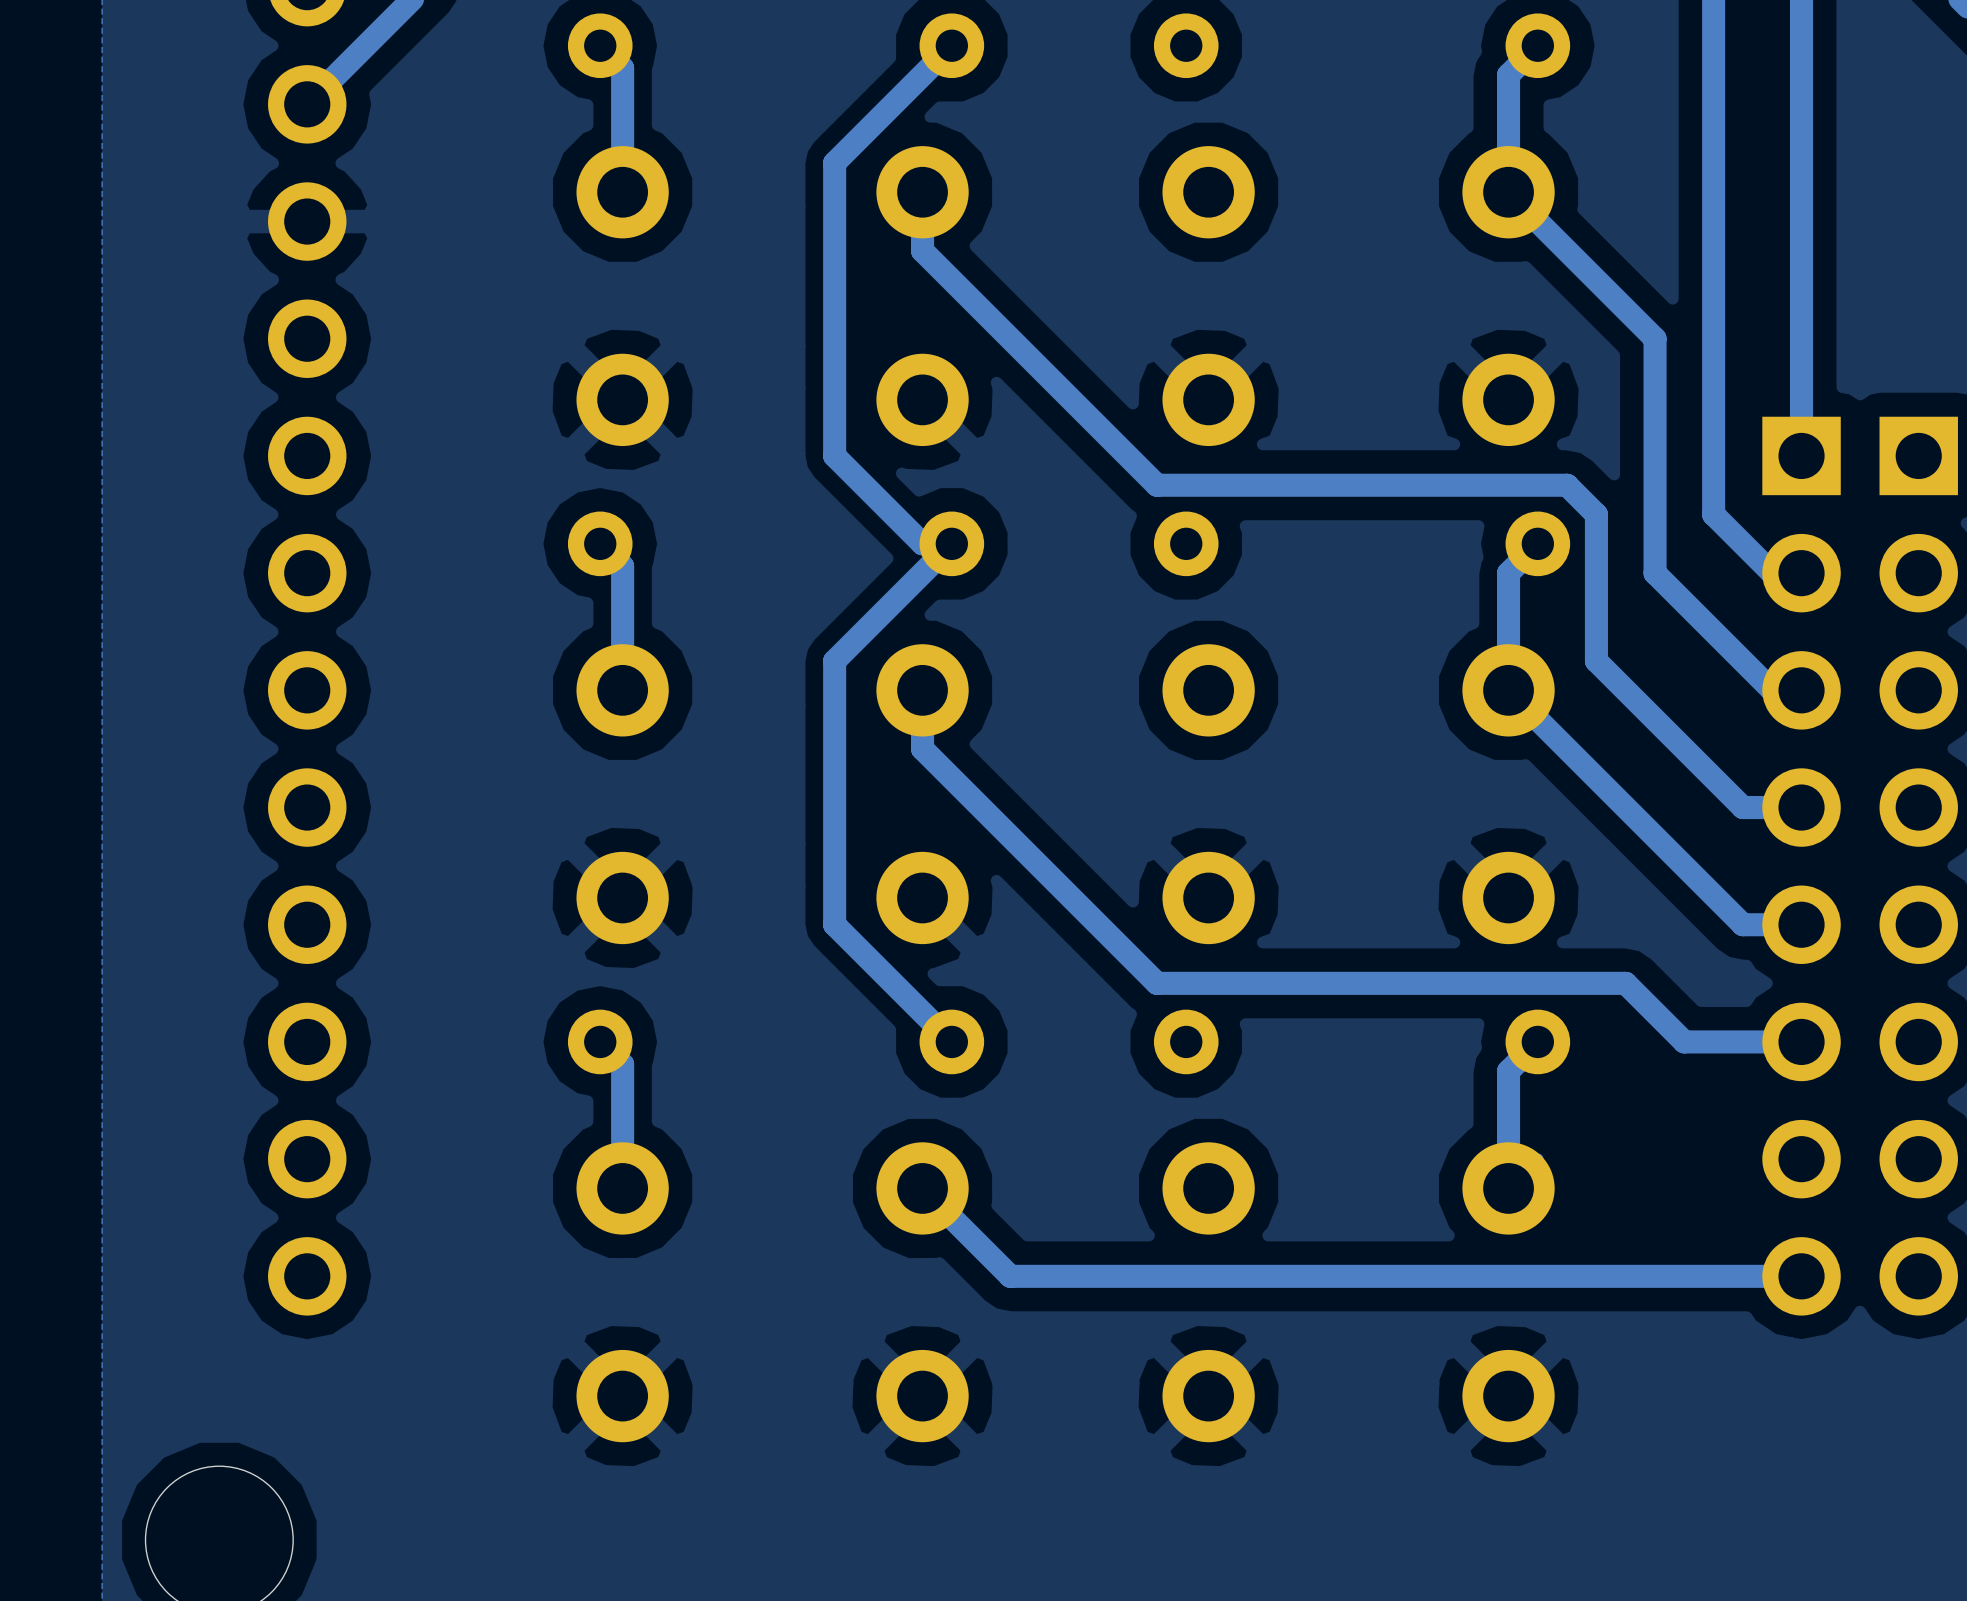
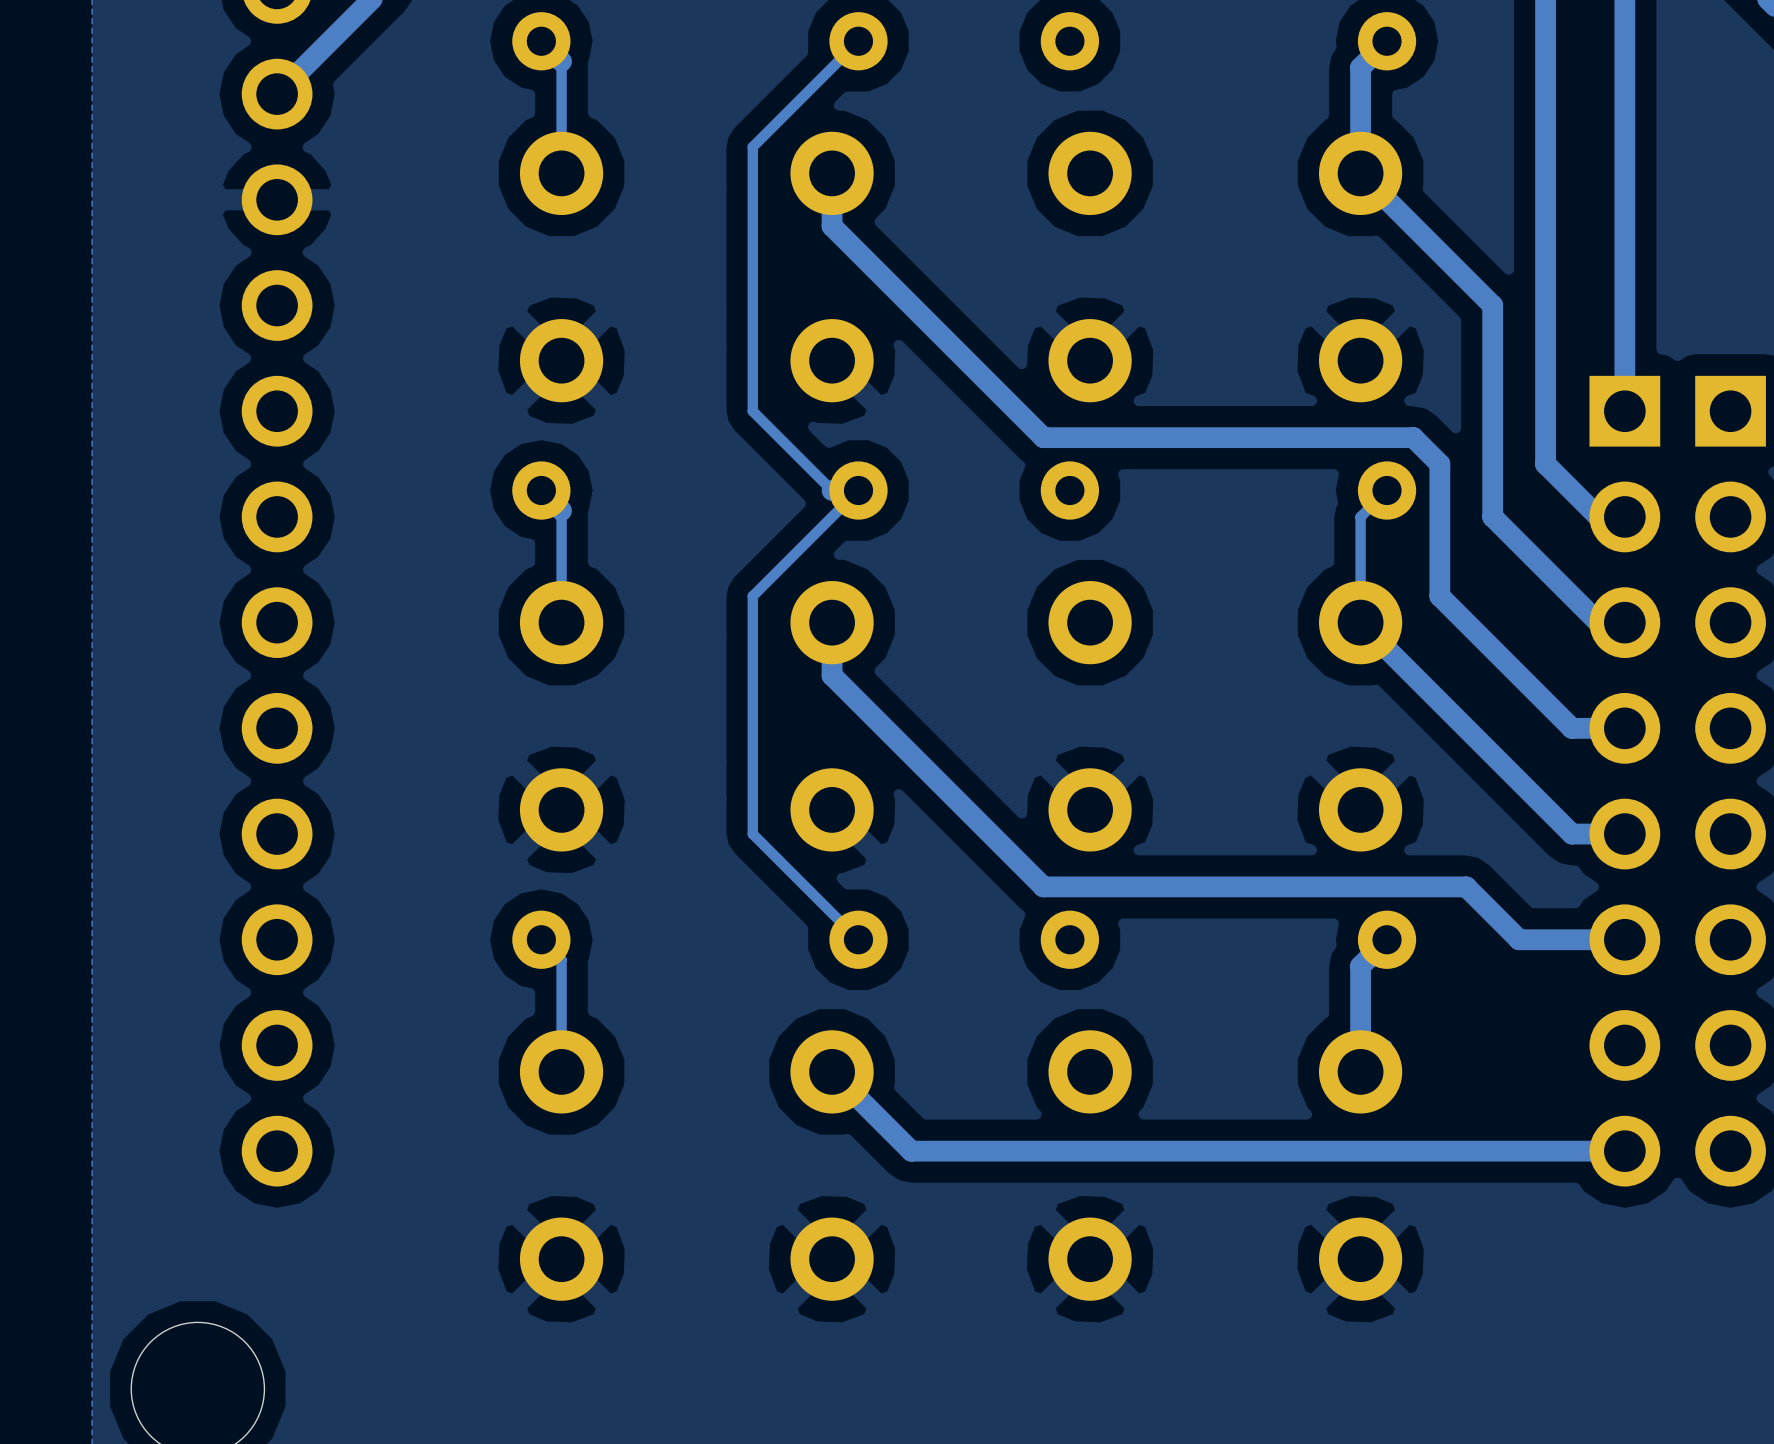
track width: thick (951, 45) (834, 162) (834, 455) (922, 543) -> thin (858, 41) (752, 146) (752, 411) (832, 490)
track width: thick (622, 68) (622, 192) -> thin (561, 61) (561, 173)
track width: thick (951, 543) (834, 661) (834, 924) (951, 1041) -> thin (858, 490) (752, 596) (752, 834) (858, 939)
track width: thick (1537, 543) (1508, 573) (1508, 690) -> thin (1387, 490) (1360, 516) (1360, 622)
track width: thick (622, 566) (622, 690) -> thin (561, 510) (561, 622)
track width: thick (600, 1041) (622, 1064) (622, 1188) -> thin (541, 939) (561, 959) (561, 1071)

